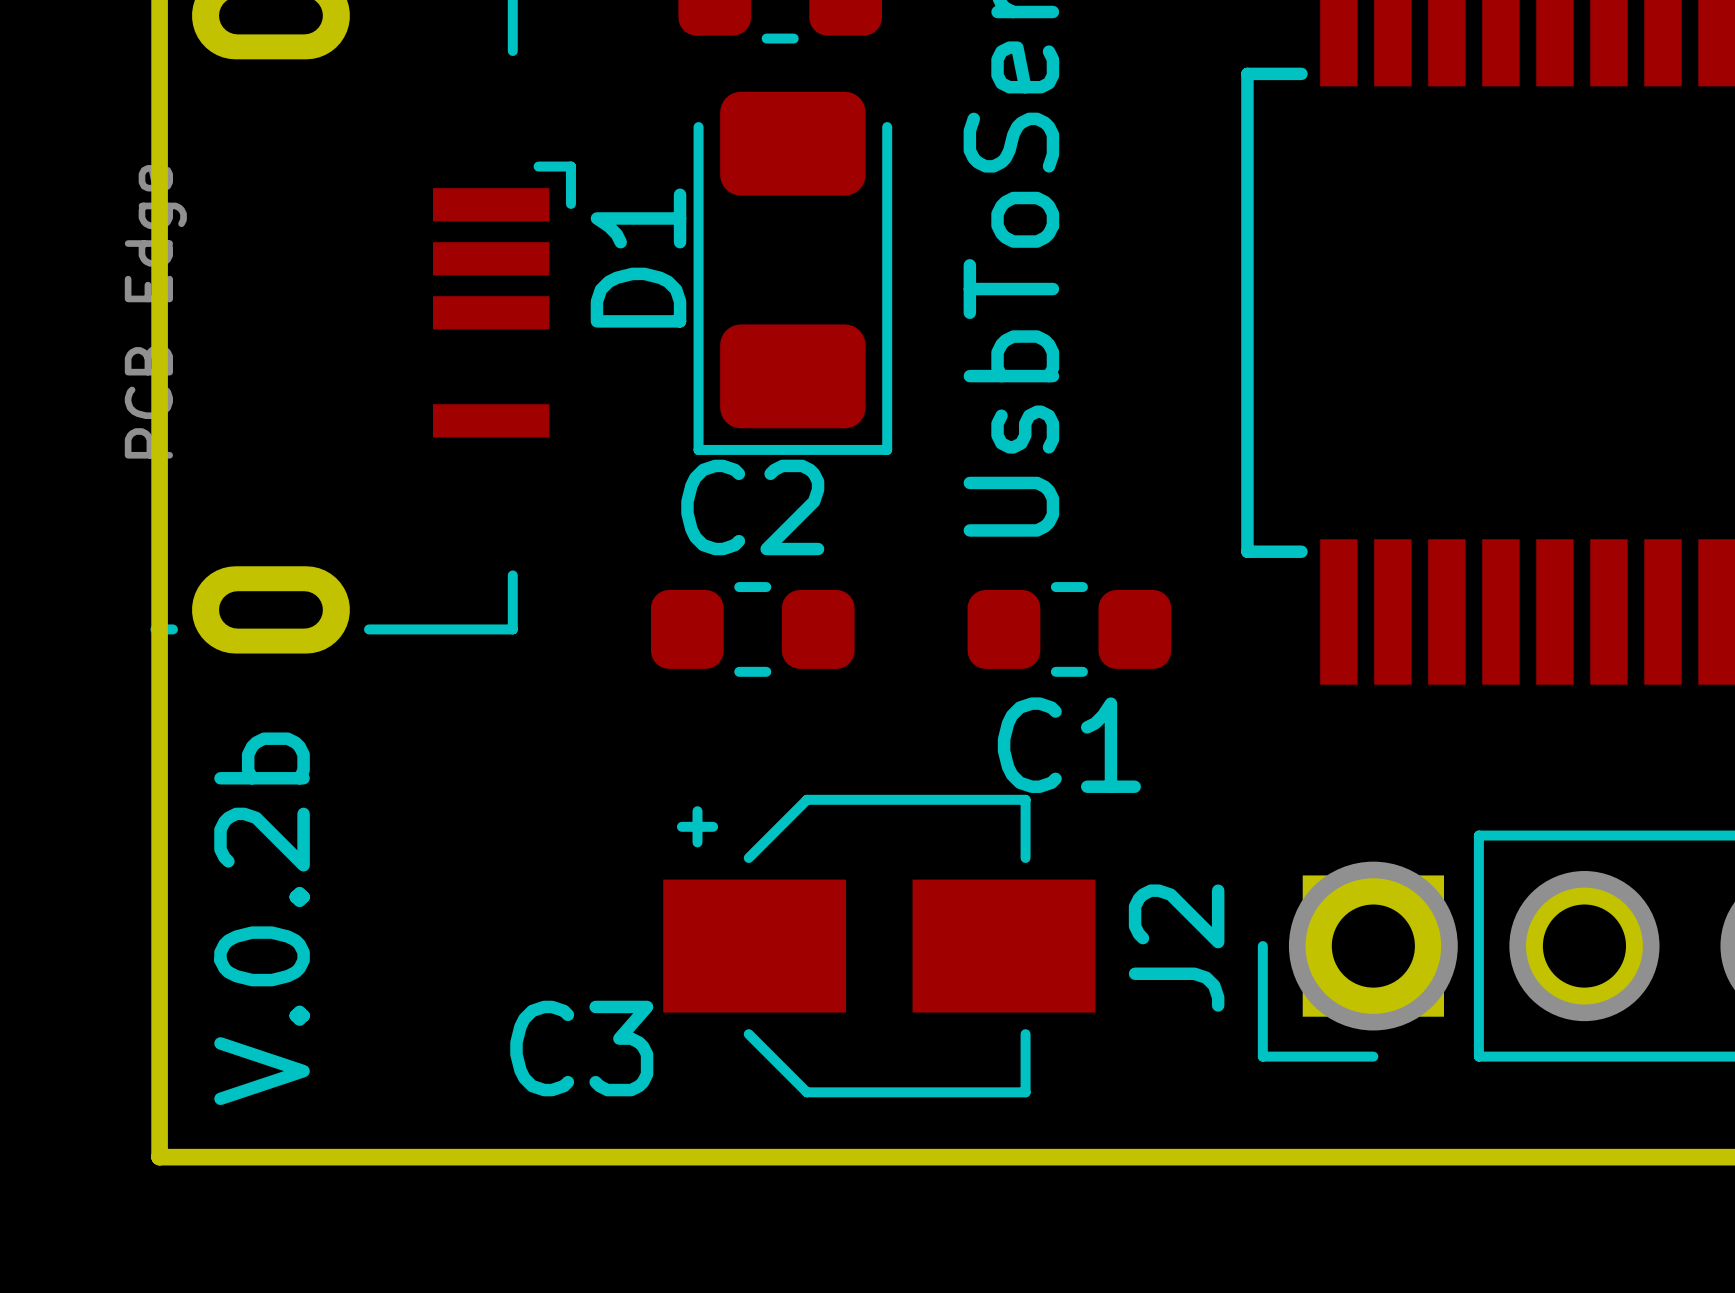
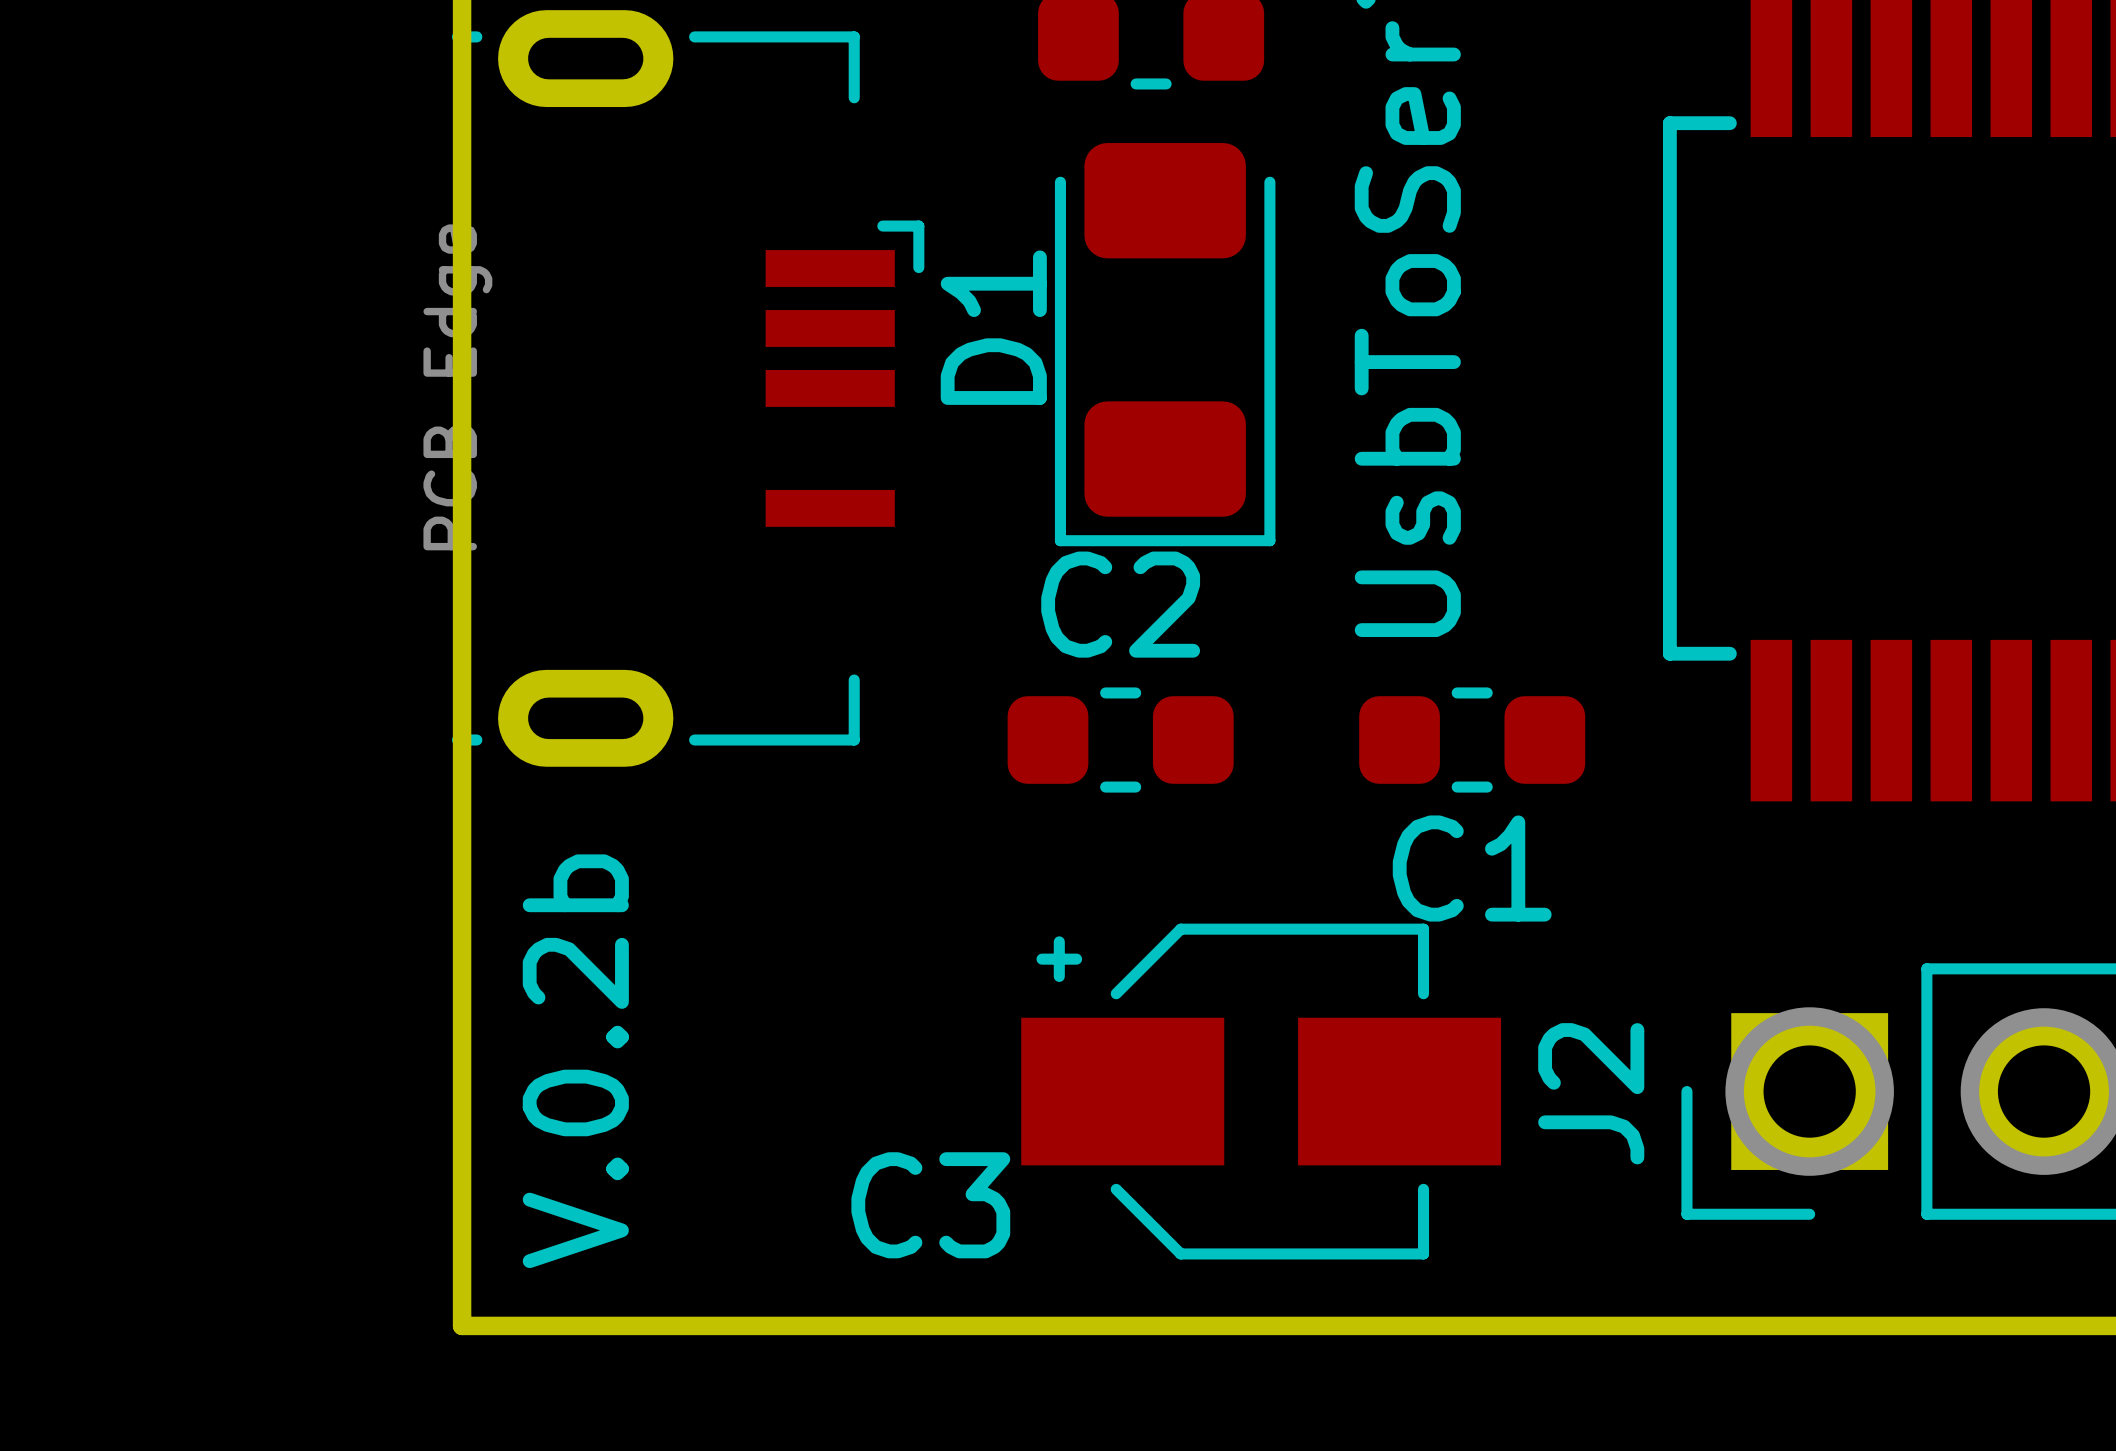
drawing shape: [1288, 861, 1458, 1031] -> [1725, 1007, 1894, 1176]

